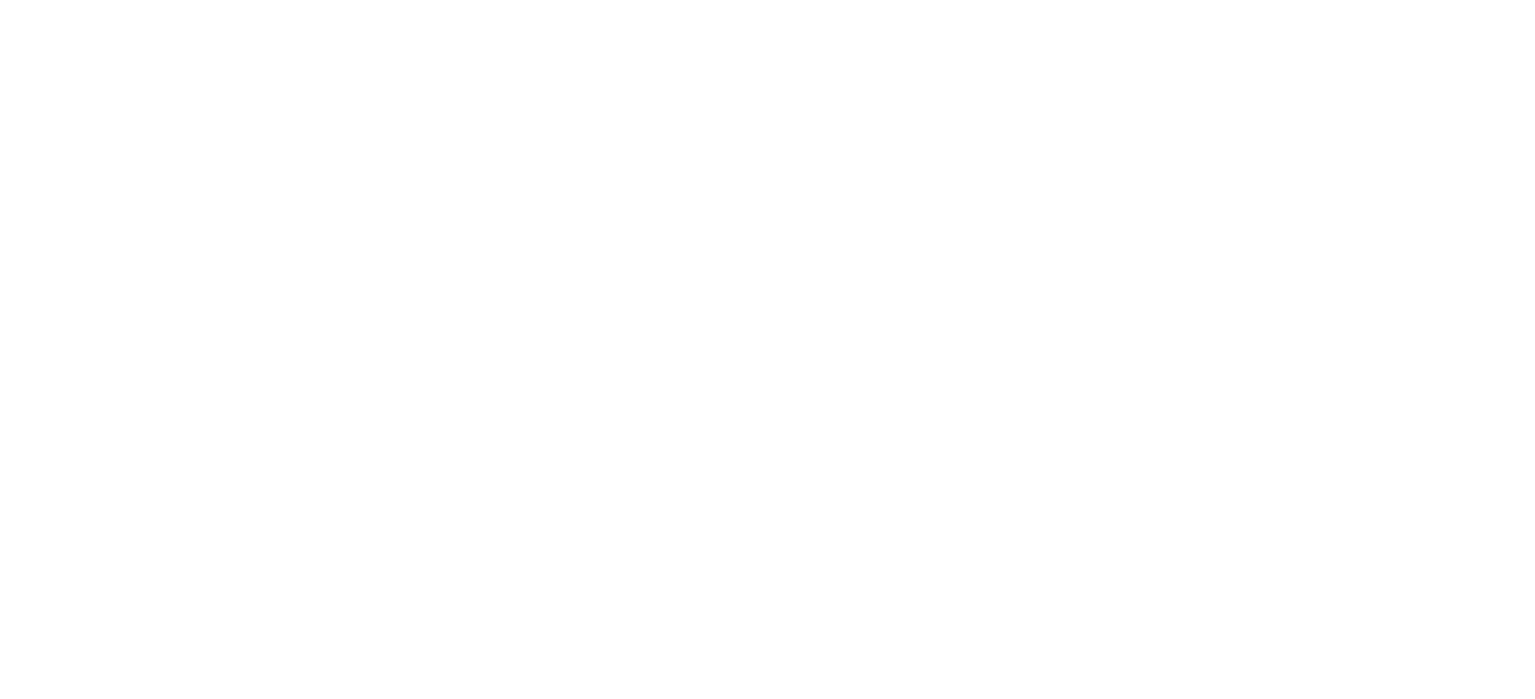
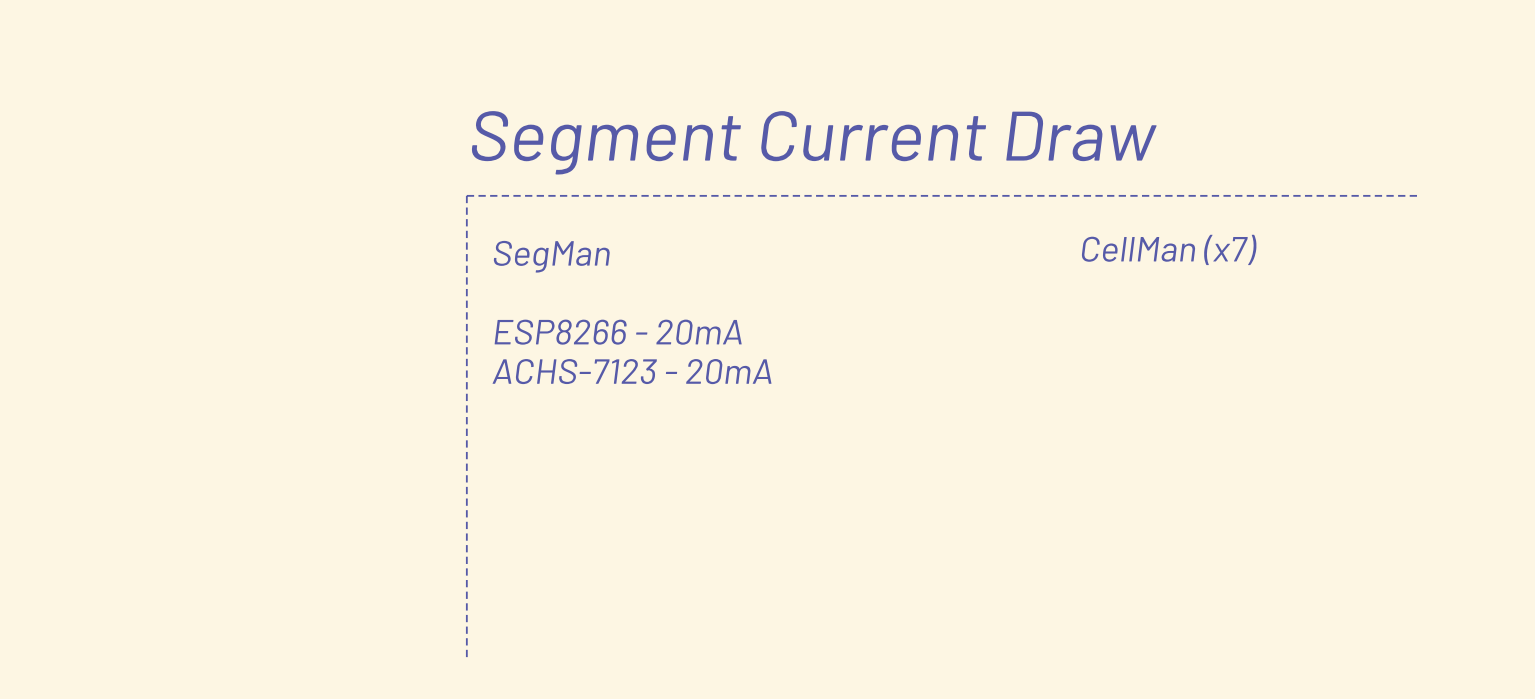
text: none -> Segment Current Draw (813, 142)
line: none -> (1421, 195) (466, 195) (466, 660)
text: none -> CellMan (x7) (1169, 249)
text: none -> SegMan (551, 256)
text: none -> ESP8266 - 20mA (618, 332)
text: none -> ACHS-7123 - 20mA (631, 371)

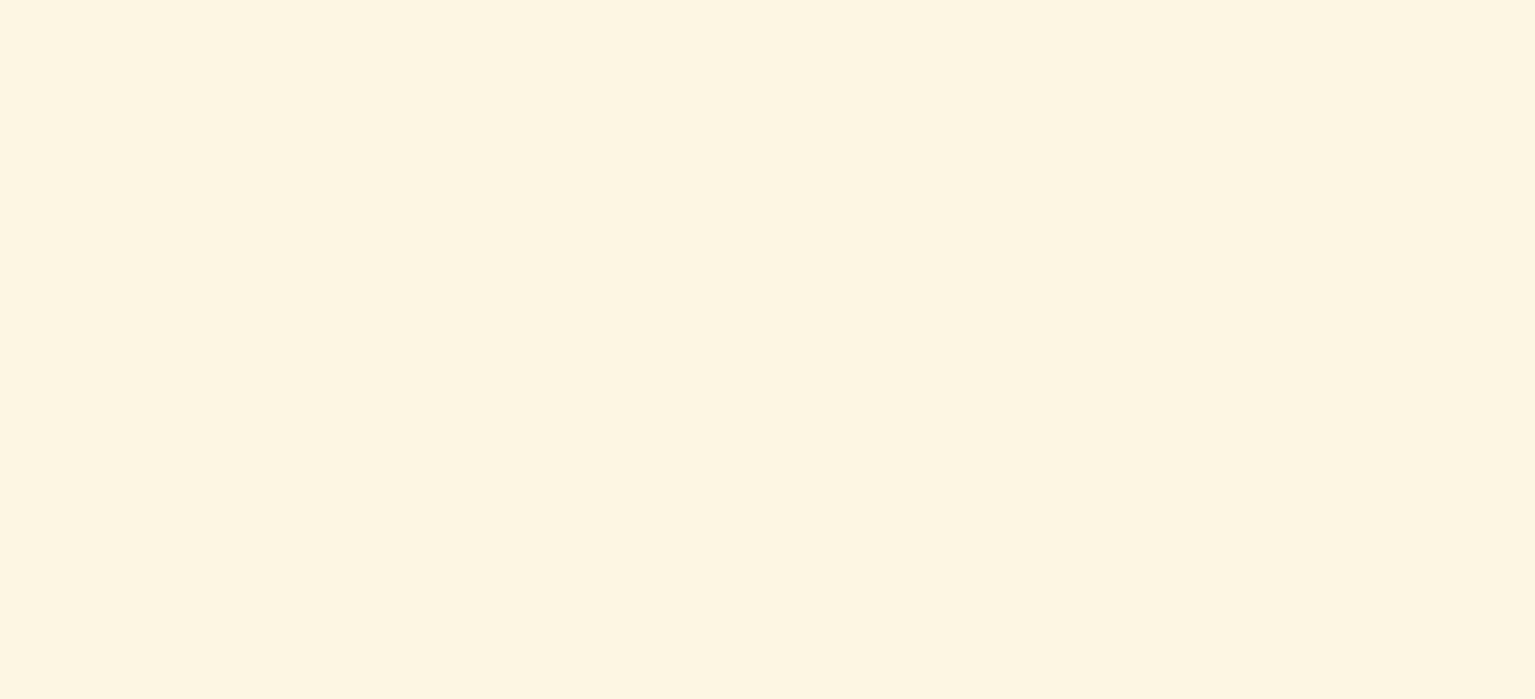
text: Segment Current Draw (813, 142) -> none
line: (1421, 195) (466, 195) (466, 660) -> none
text: CellMan (x7) (1169, 249) -> none
text: SegMan (551, 256) -> none
text: ESP8266 - 20mA (618, 332) -> none
text: ACHS-7123 - 20mA (631, 371) -> none

